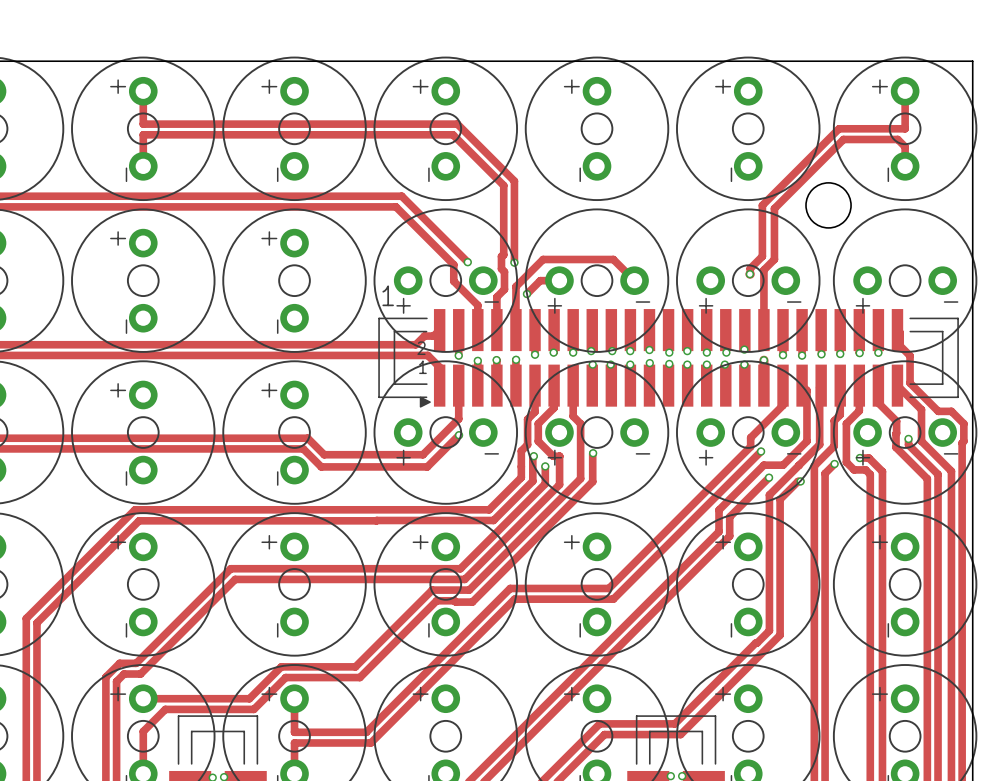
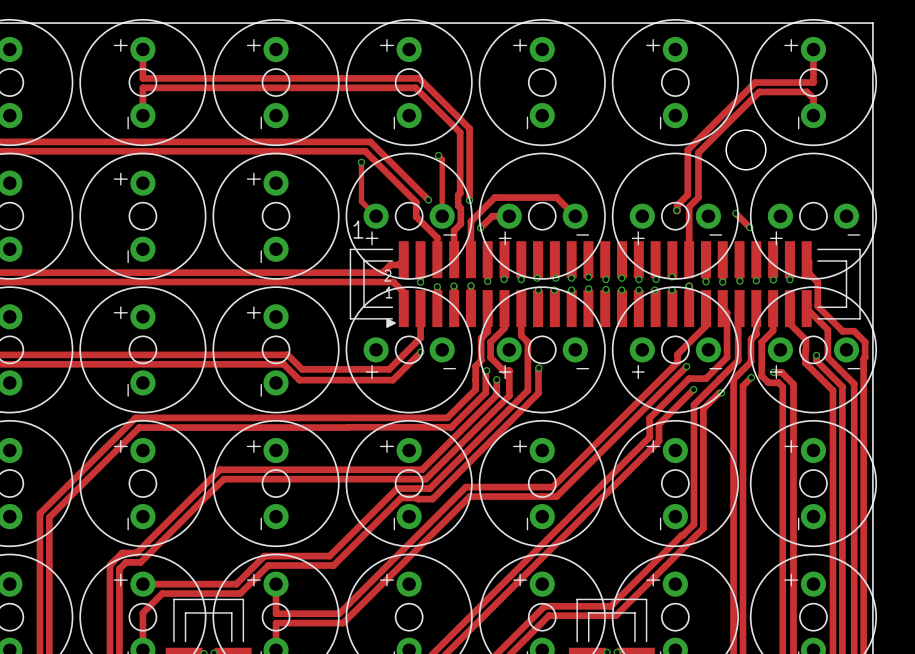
track: none -> (438, 155) (442, 159) (442, 216)
via: none -> (438, 155)
track: none -> (361, 162) (361, 201) (376, 216)
via: none -> (361, 162)
via: none -> (735, 213)
track: none -> (735, 213) (749, 227)
via: none -> (749, 227)

